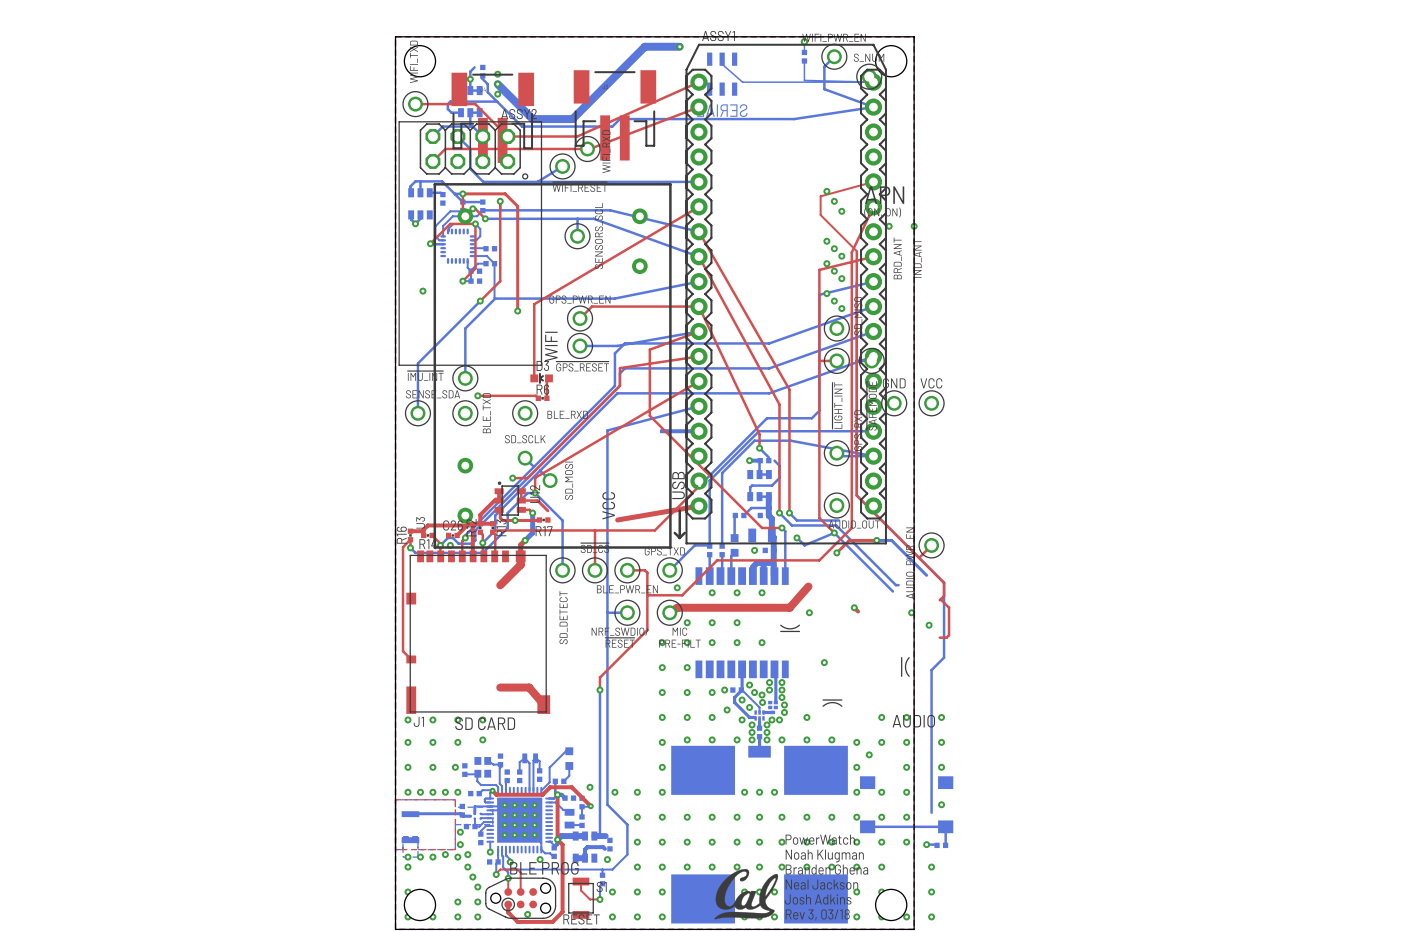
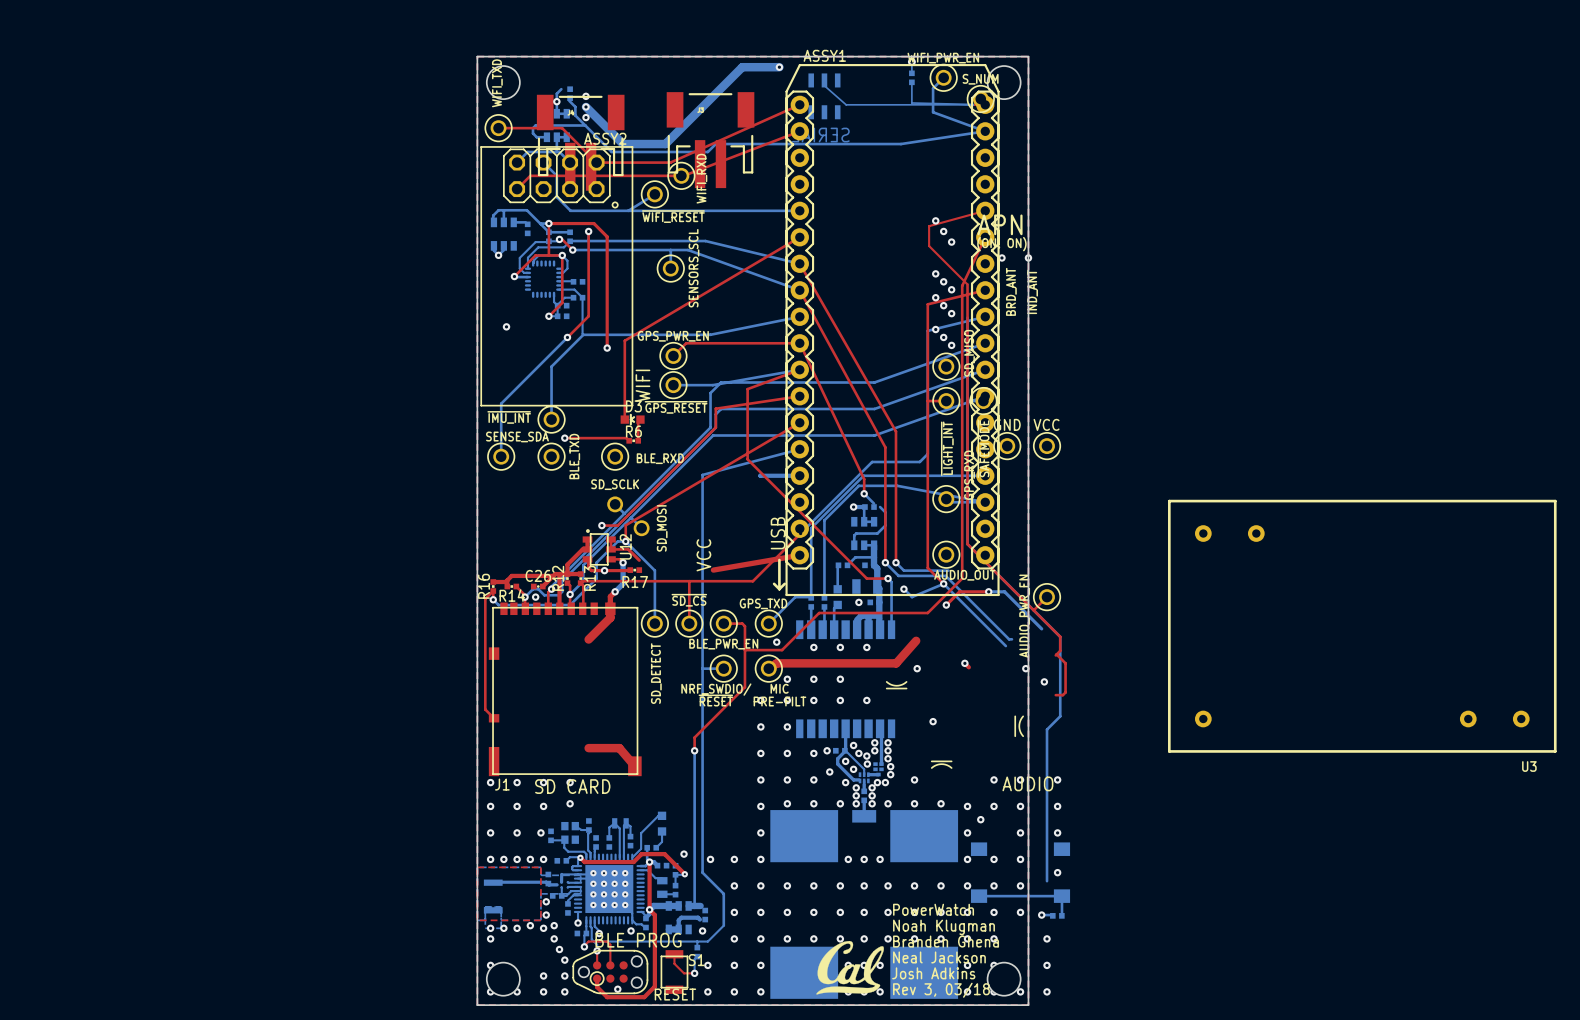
U3 rotation: 0° (552, 365) -> 90° counterclockwise (1362, 626)
U3 position: (552, 365) -> (1362, 626)

